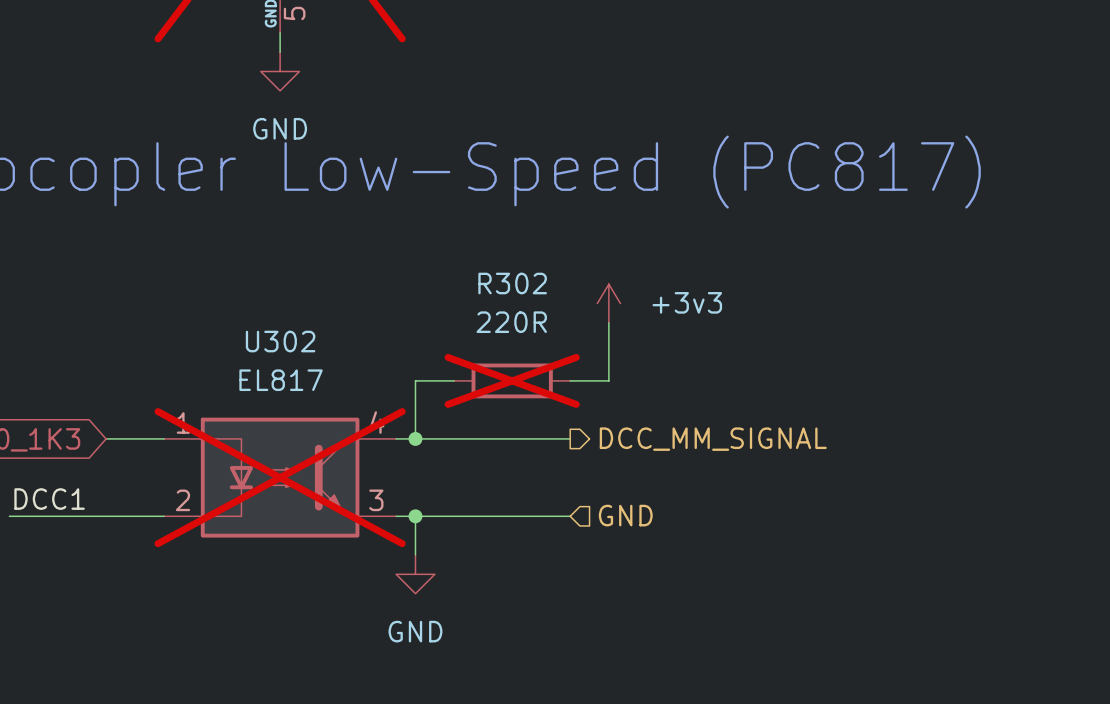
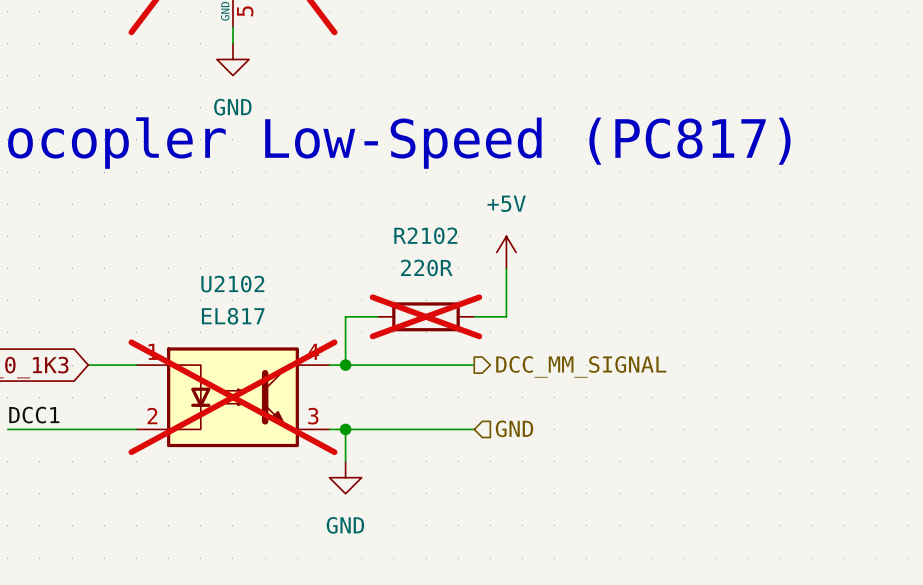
R302 name: R302 (512, 283) -> R2102 (425, 235)
power symbol: +3v3 (608, 303) -> +5V (506, 252)
U302 name: U302 (280, 341) -> U2102 (232, 284)

